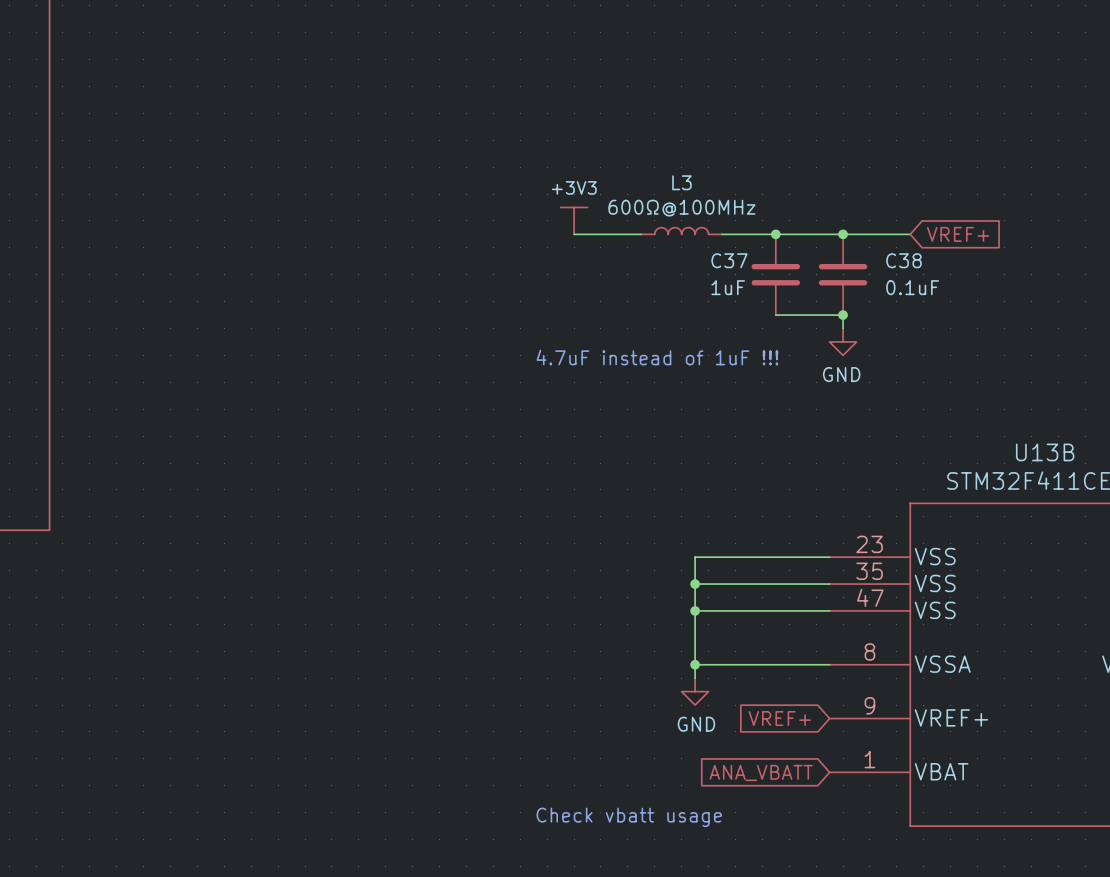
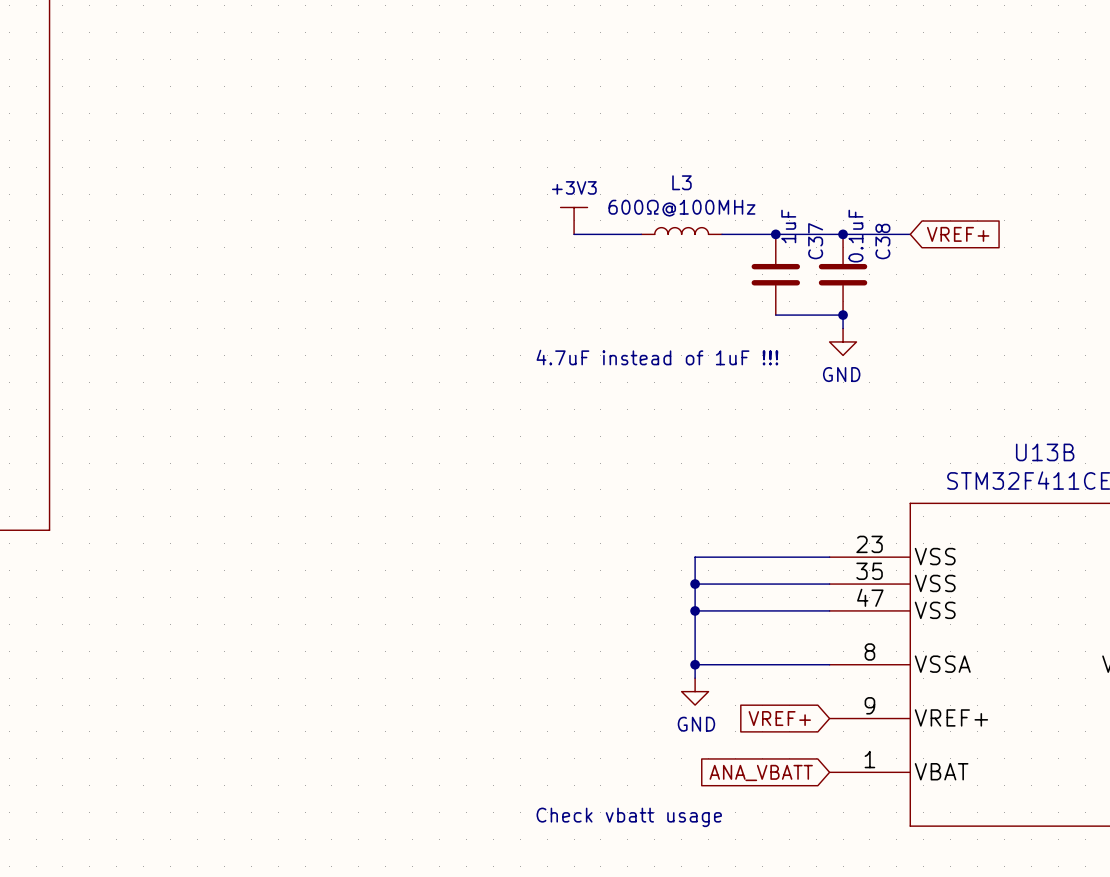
C37 name rotation: 0° (729, 260) -> 90° counterclockwise (815, 241)
C37 name position: C37 (729, 260) -> C37 (815, 241)
C38 name rotation: 0° (903, 260) -> 90° counterclockwise (882, 241)
C37 value rotation: 0° (728, 287) -> 90° counterclockwise (788, 226)
C37 value position: 1uF (728, 287) -> 1uF (788, 226)
C38 value rotation: 0° (912, 287) -> 90° counterclockwise (855, 236)
C38 value position: 0.1uF (912, 287) -> 0.1uF (855, 236)

